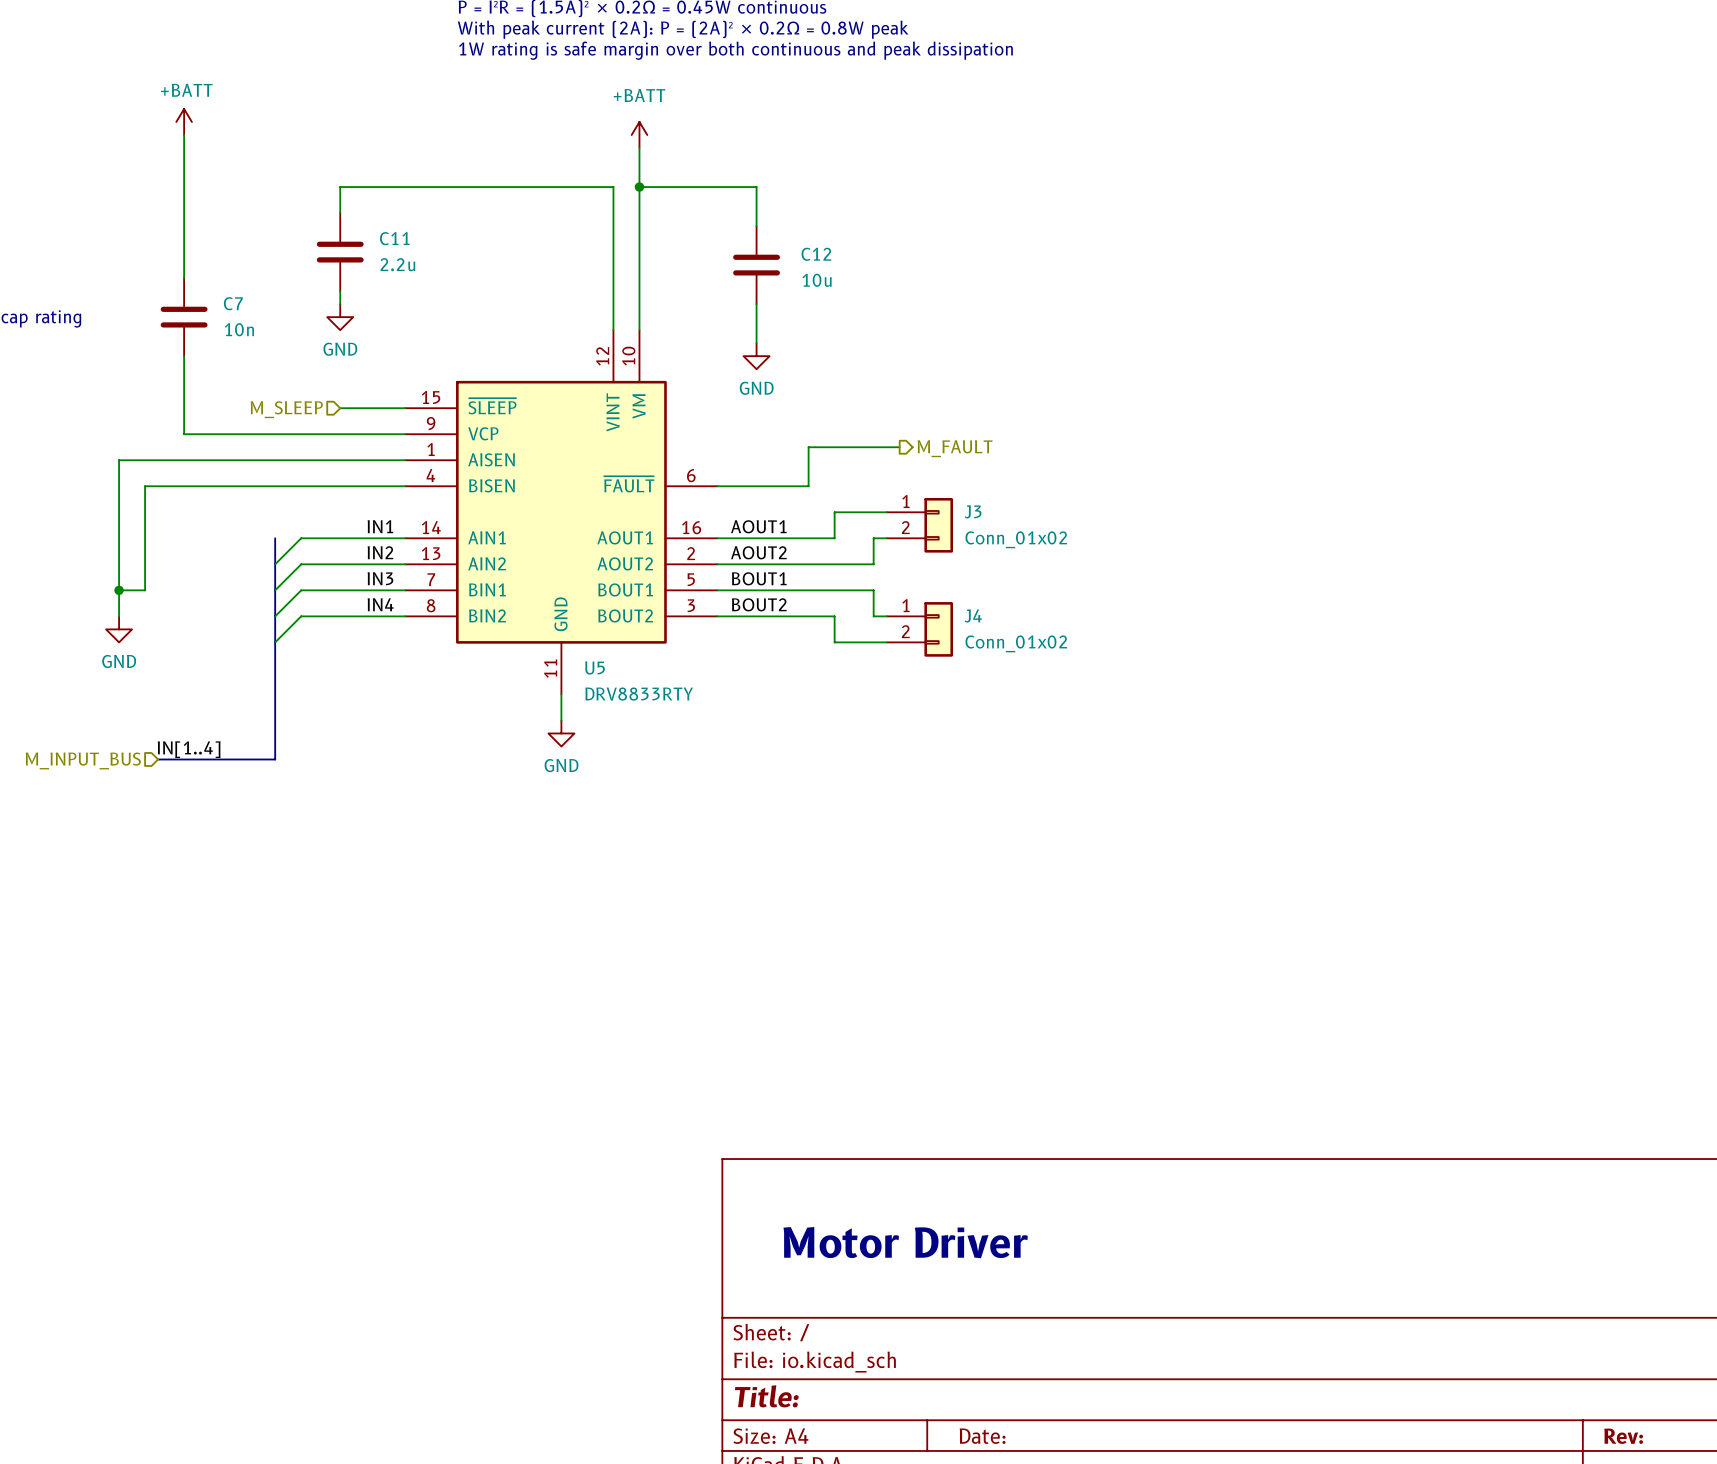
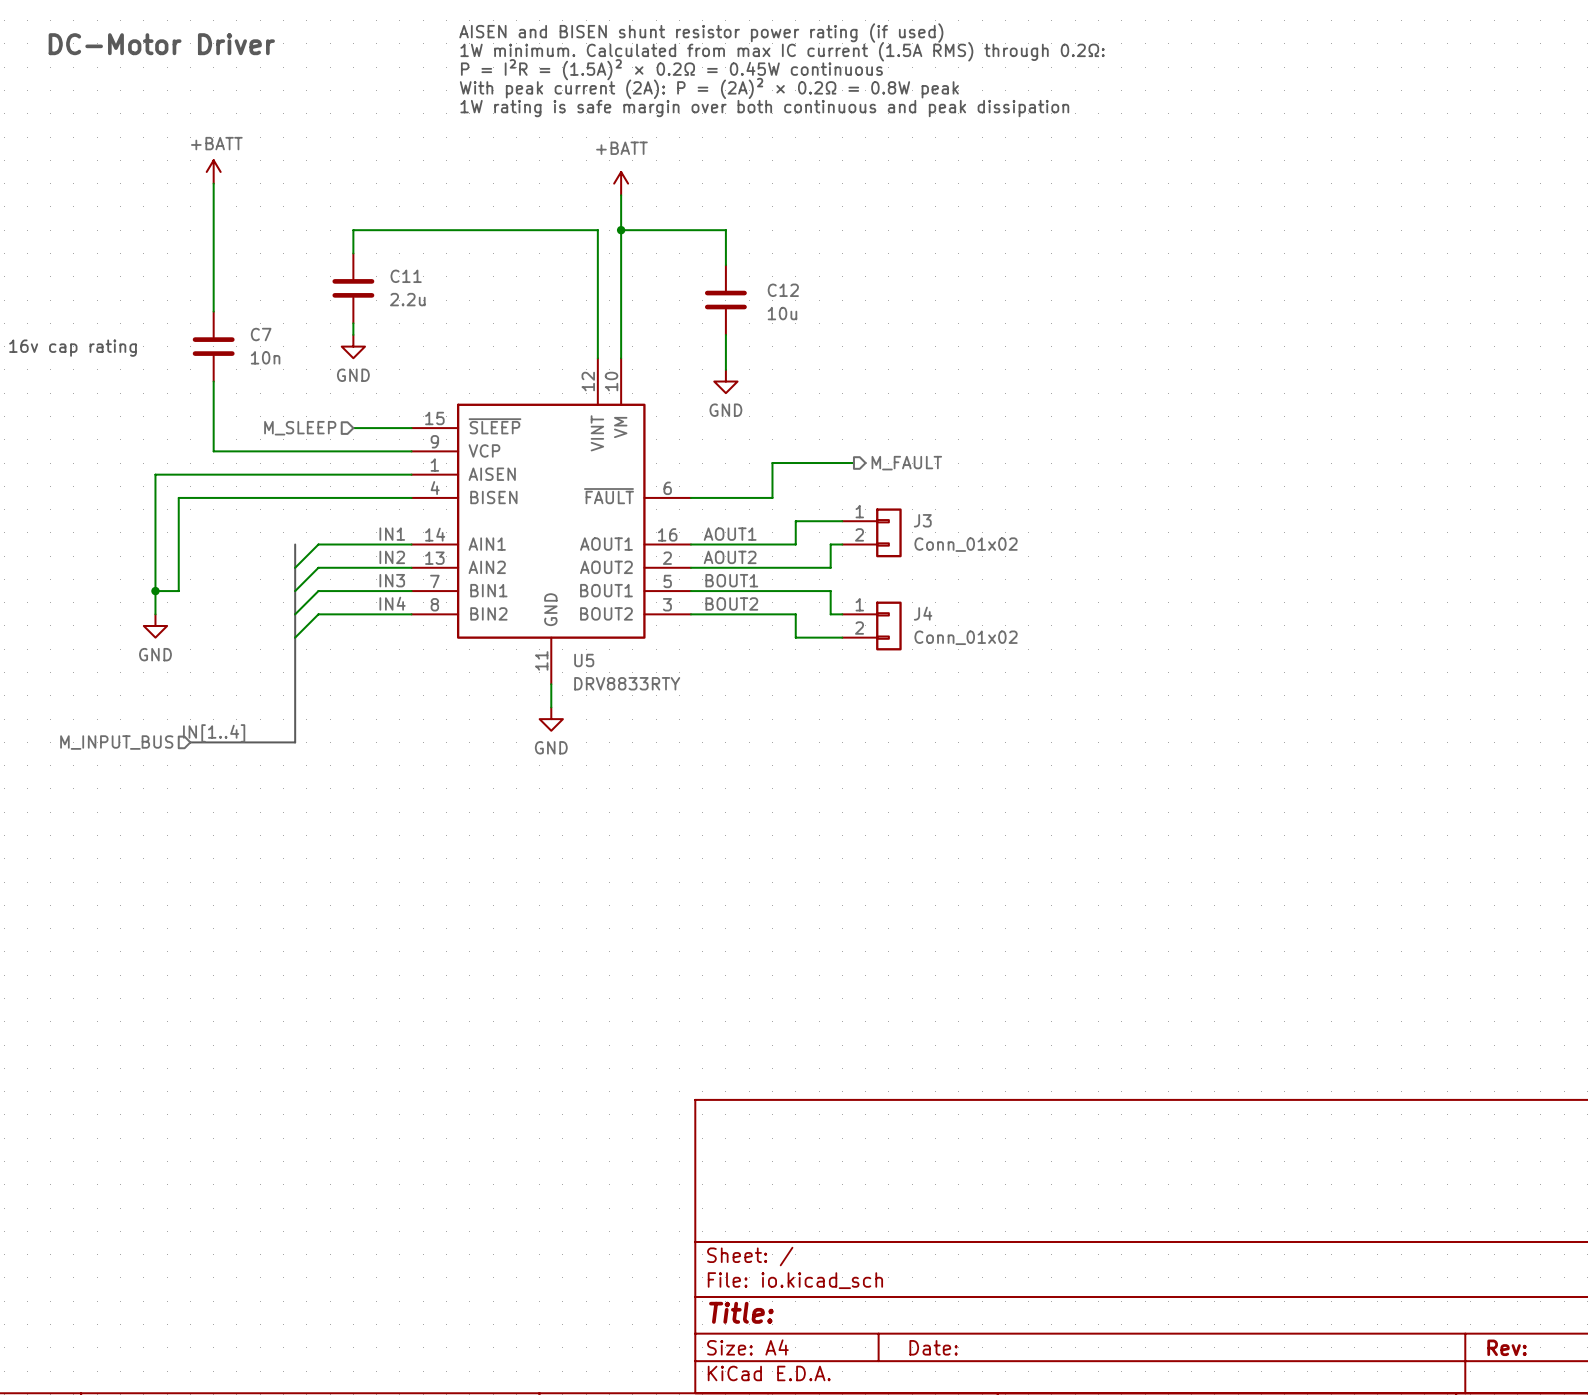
text: Motor Driver (905, 1242) -> none

